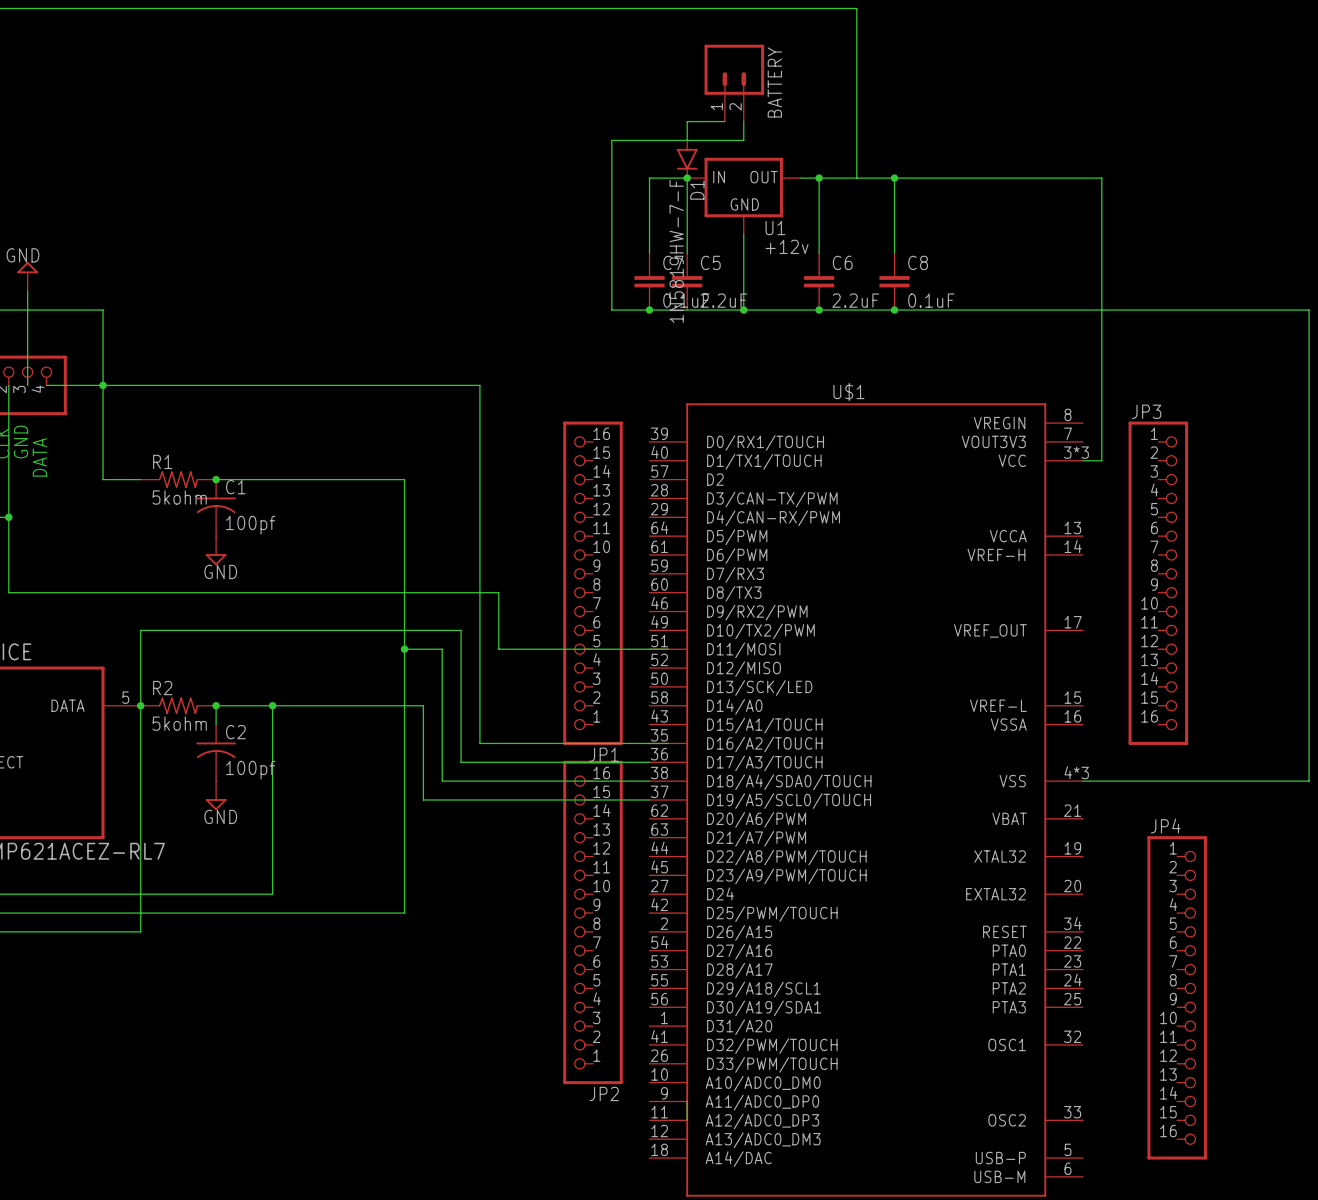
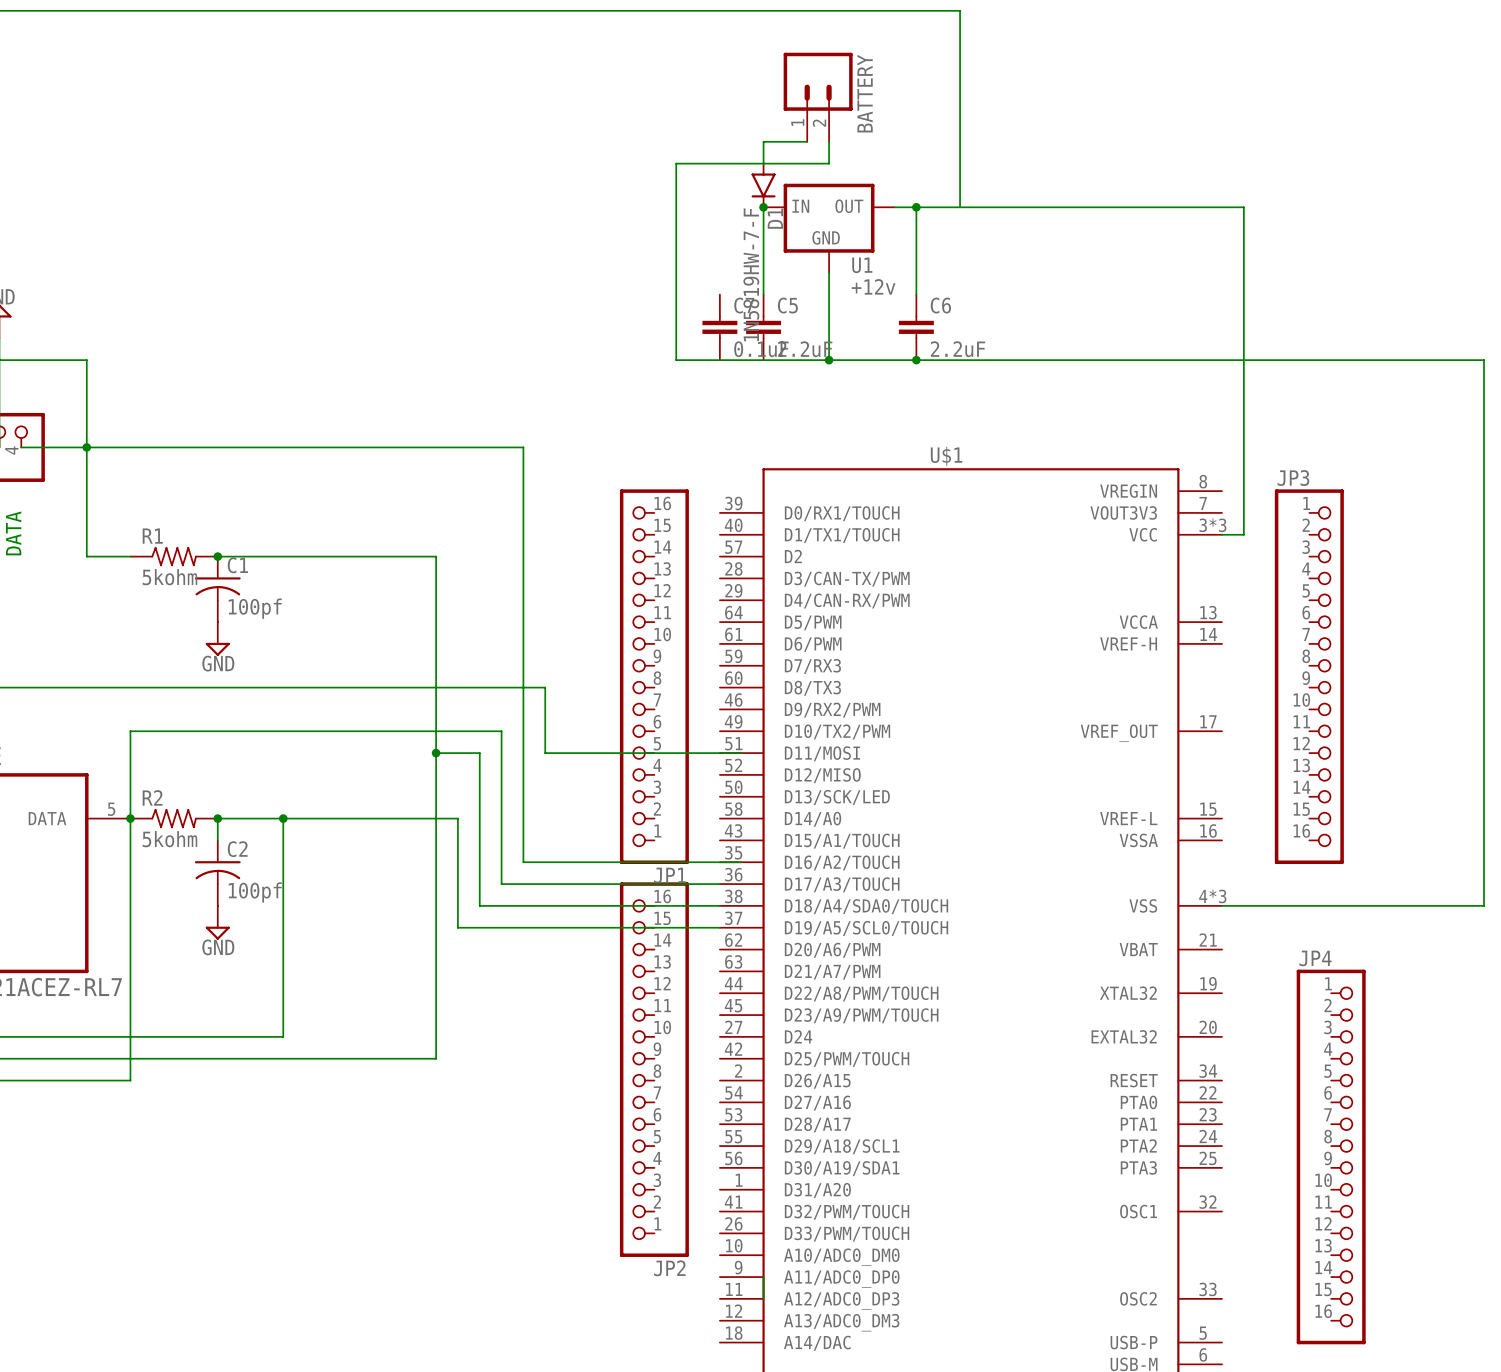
wire: (687, 178) (649, 178) (649, 253) -> none
wire: (894, 178) (894, 253) -> none
junction: (894, 178) -> none
C8: 0.1uF (894, 281) -> none
junction: (649, 310) -> none
junction: (894, 310) -> none

